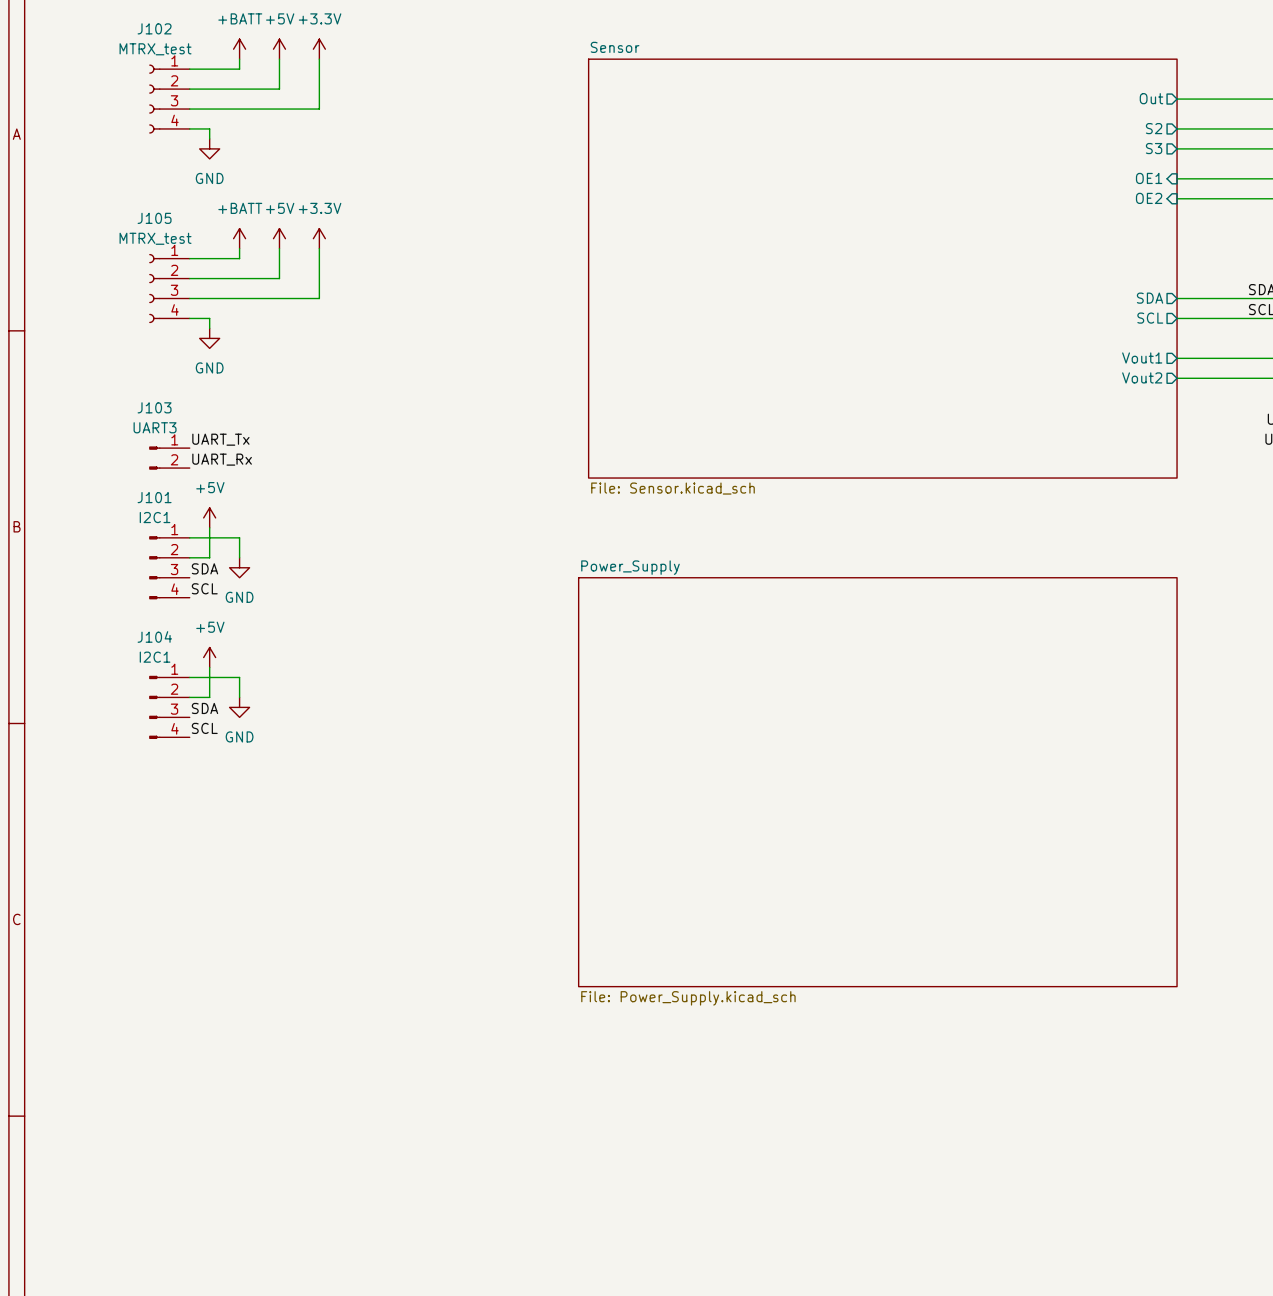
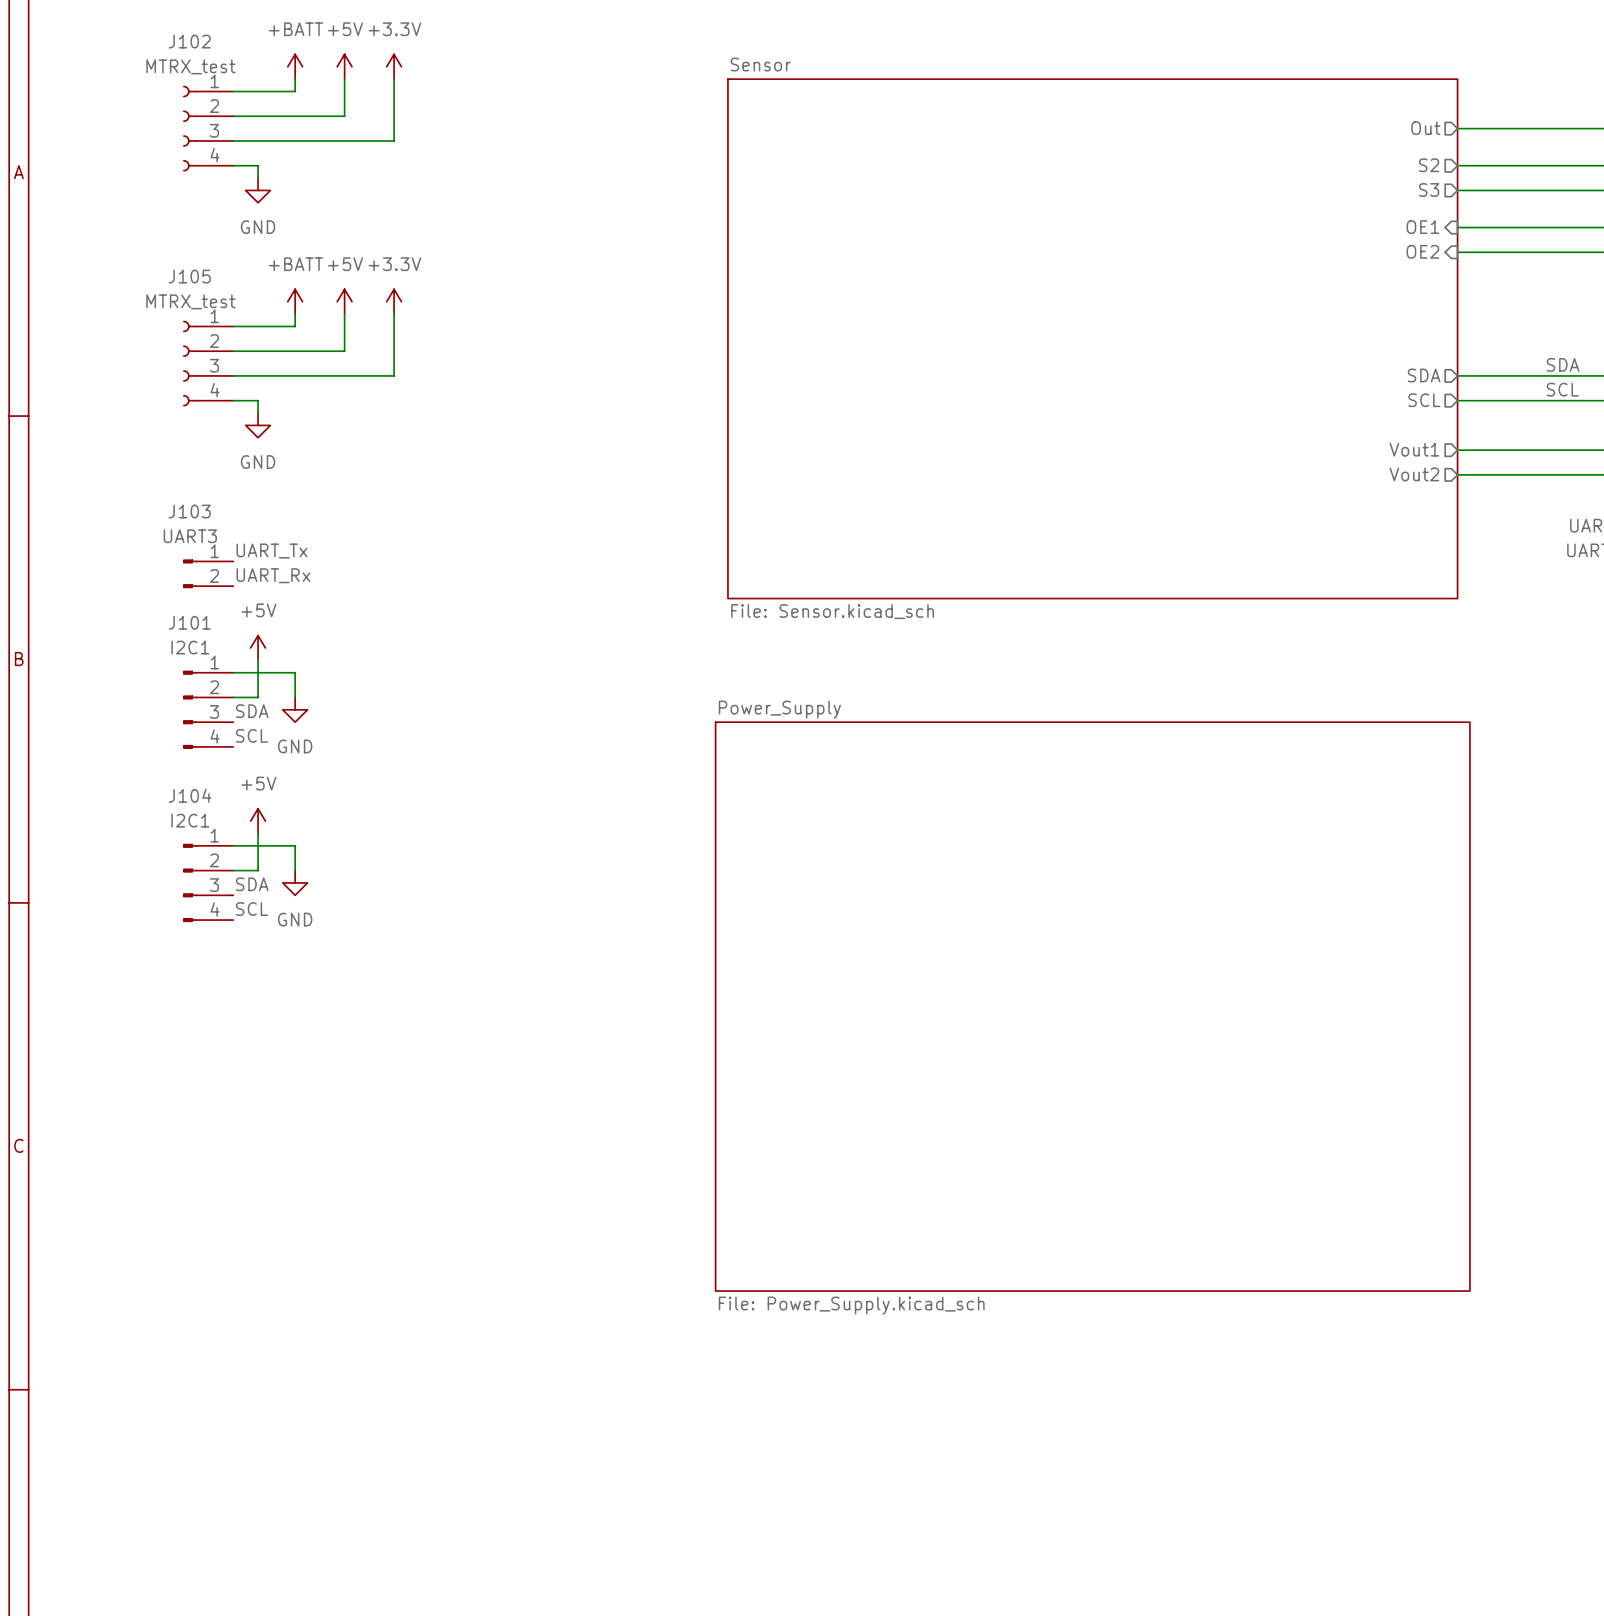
sheet Power_Supply: File: Power_Supply.kicad_sch (877, 782) -> none
sheet Power_Supply: none -> File: Power_Supply.kicad_sch (1092, 1006)

